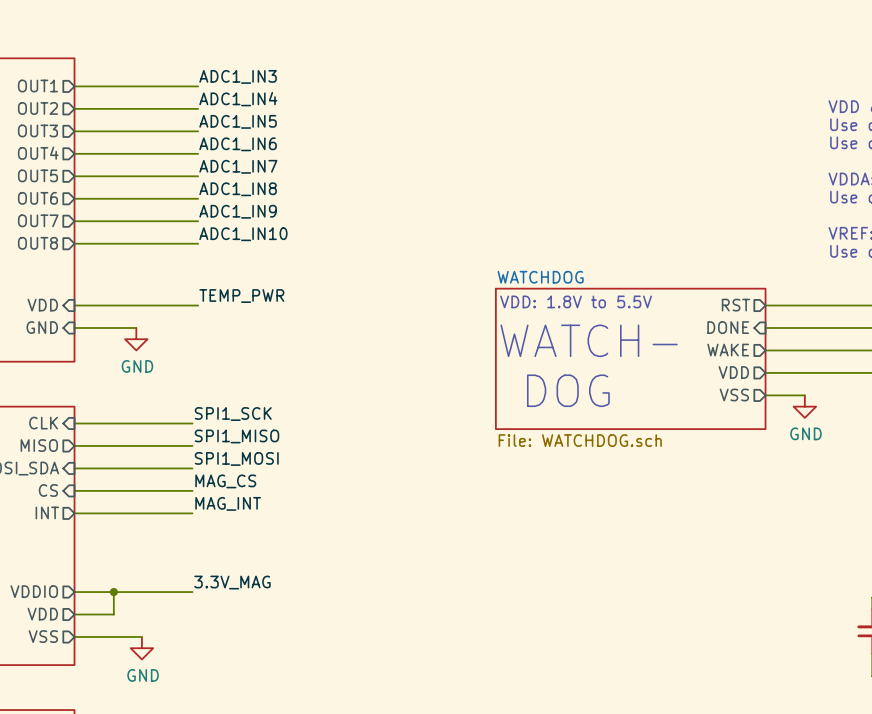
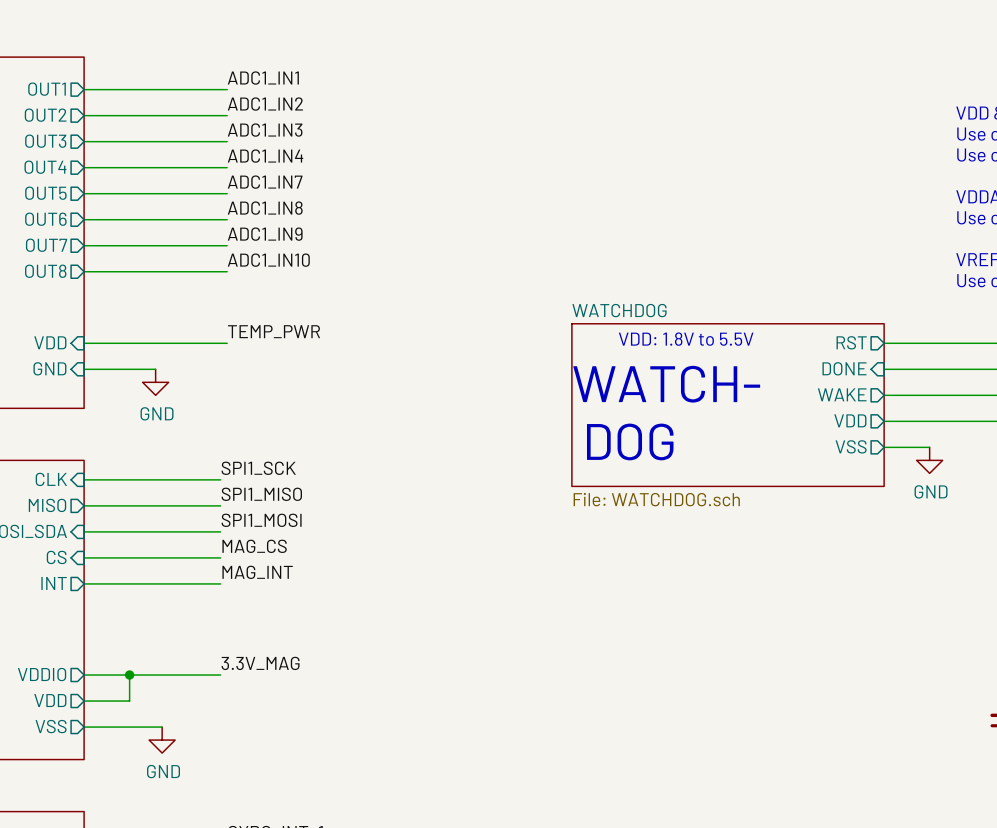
label: ADC1_IN3 (238, 76) -> ADC1_IN1 (263, 78)
label: ADC1_IN4 (238, 99) -> ADC1_IN2 (265, 104)
label: ADC1_IN5 (238, 121) -> ADC1_IN3 (265, 130)
label: ADC1_IN6 (238, 144) -> ADC1_IN4 (265, 156)

